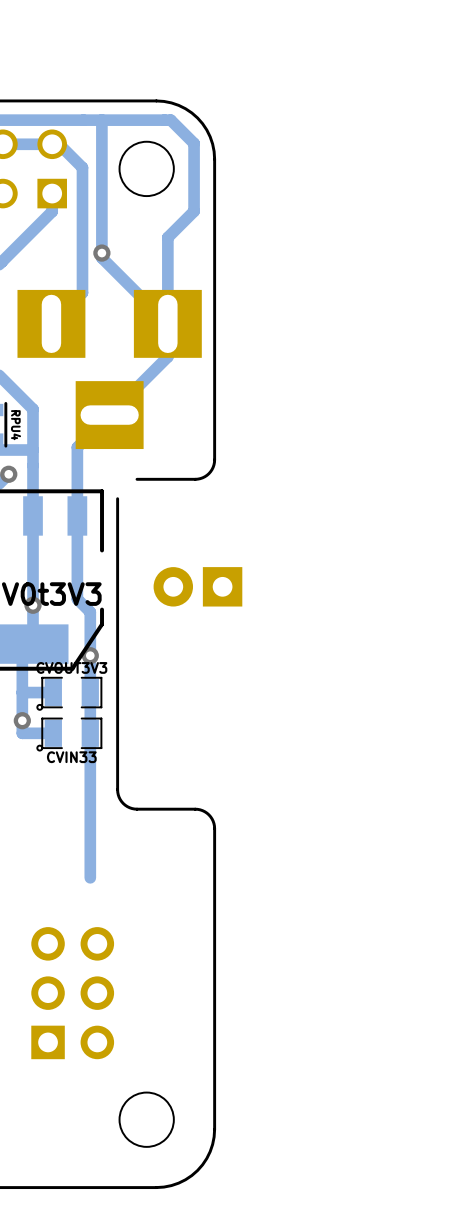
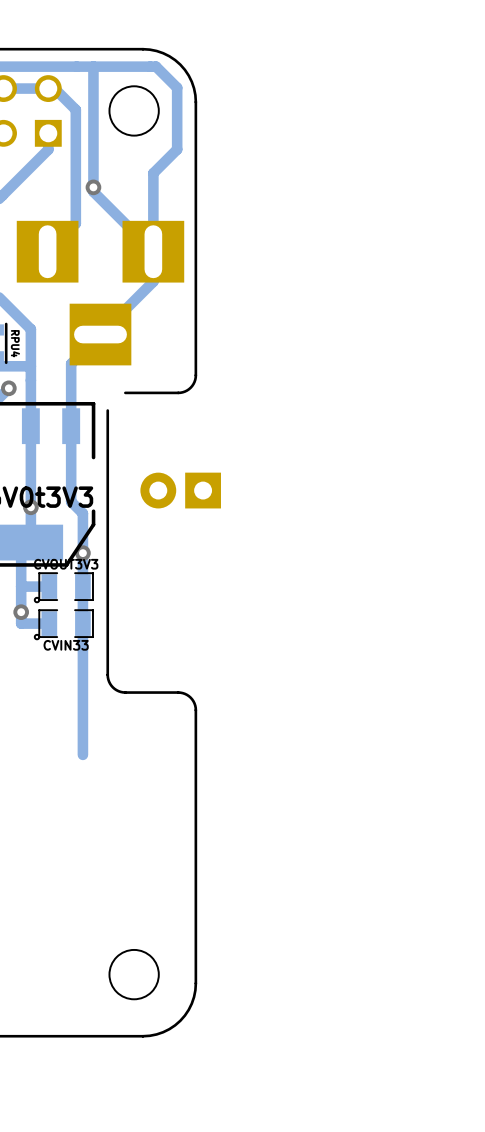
part: (72, 993) -> none

